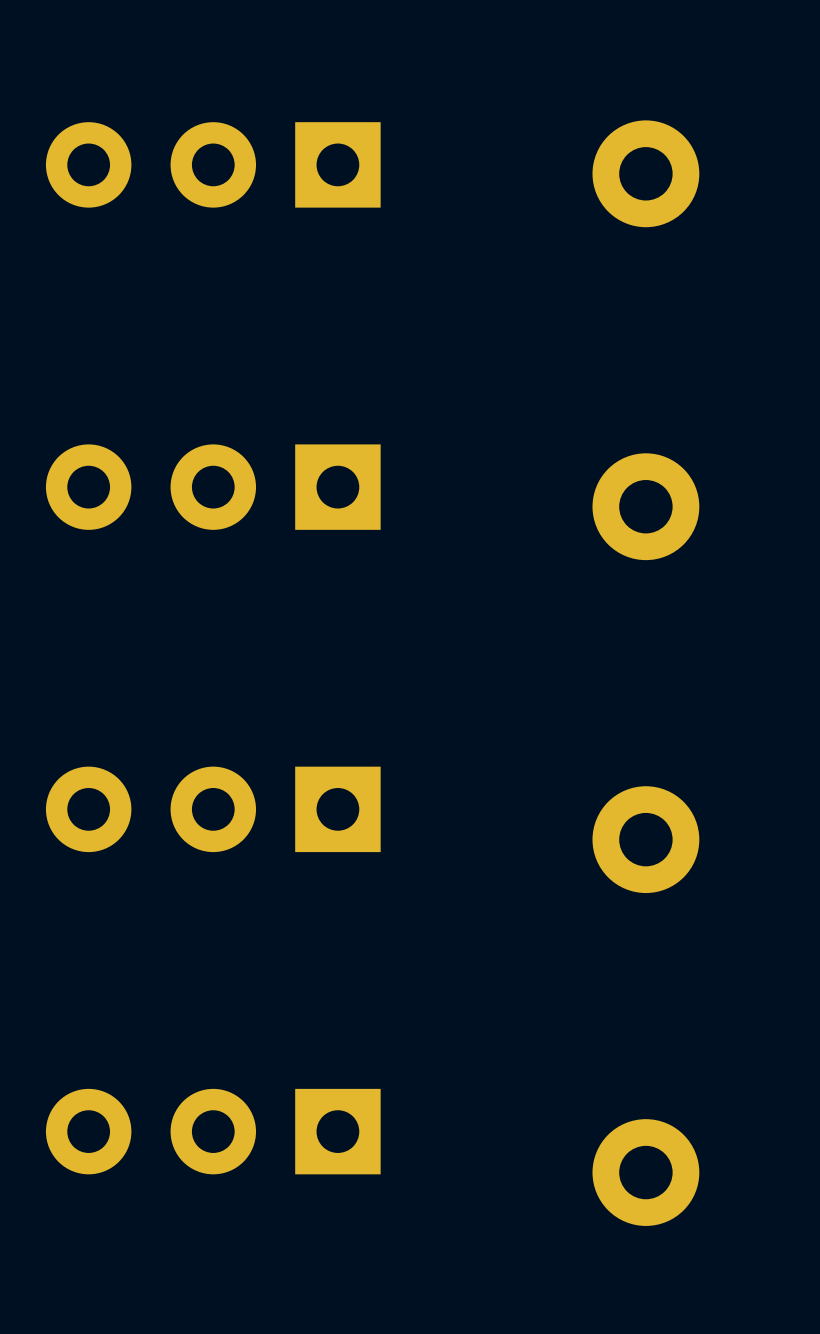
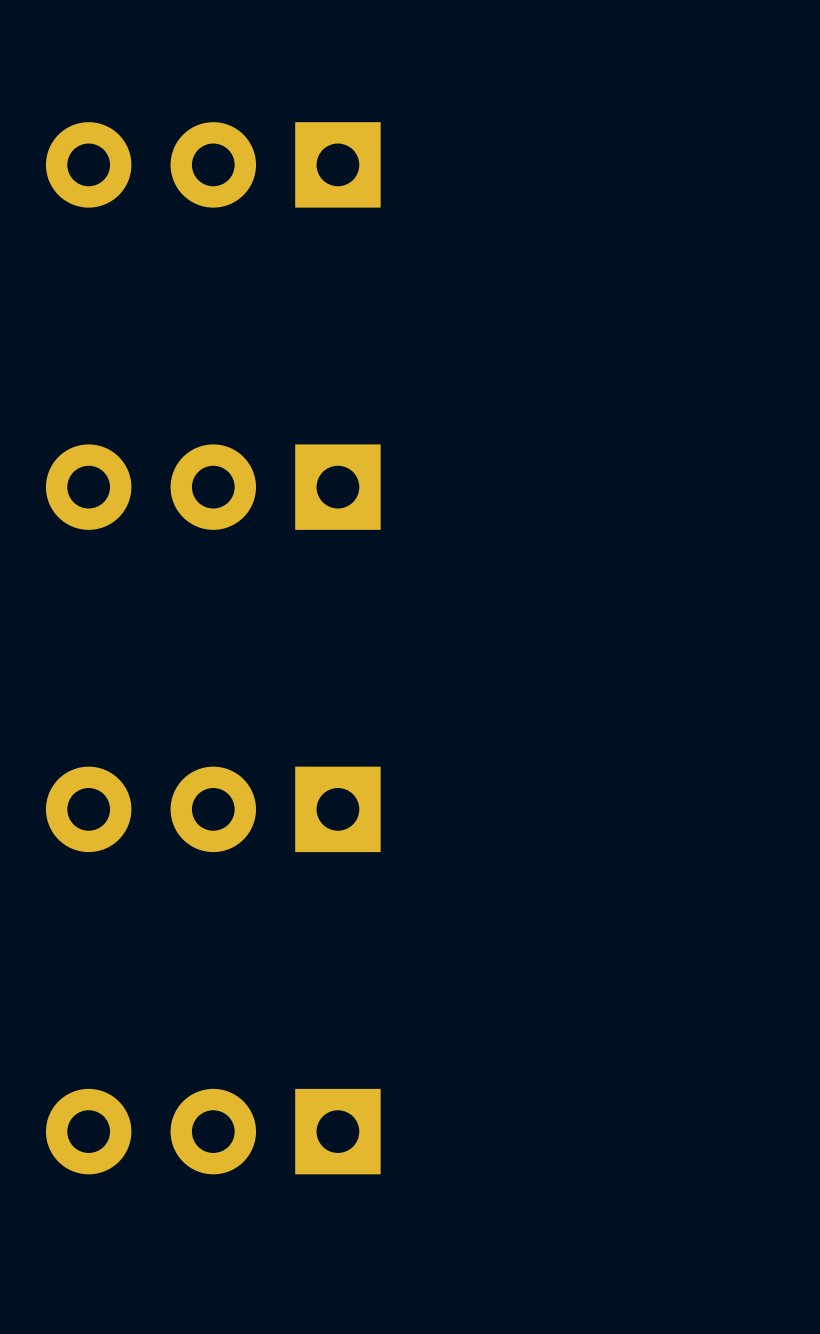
part: (645, 173) -> none
part: (645, 506) -> none
part: (645, 839) -> none
part: (645, 1172) -> none

